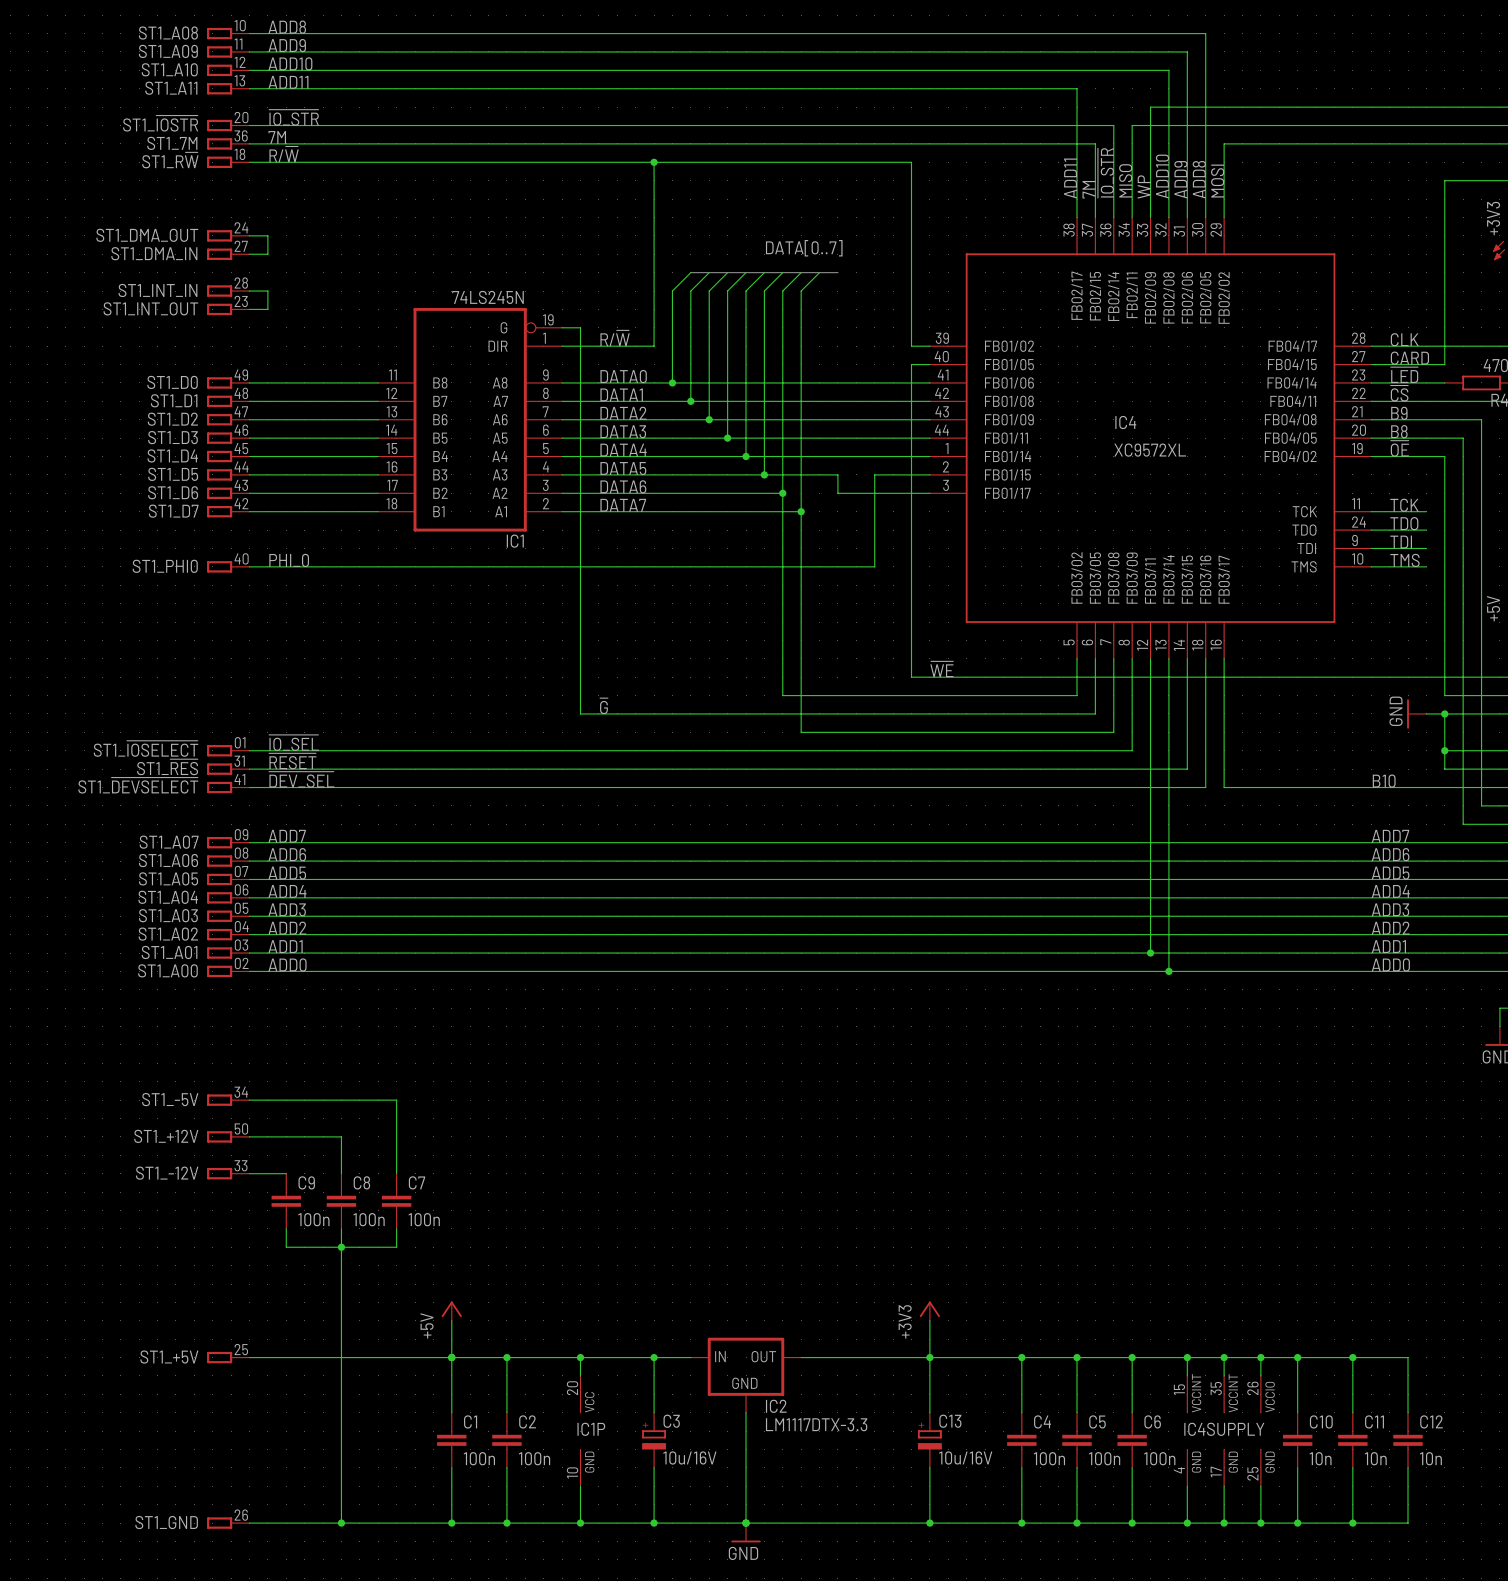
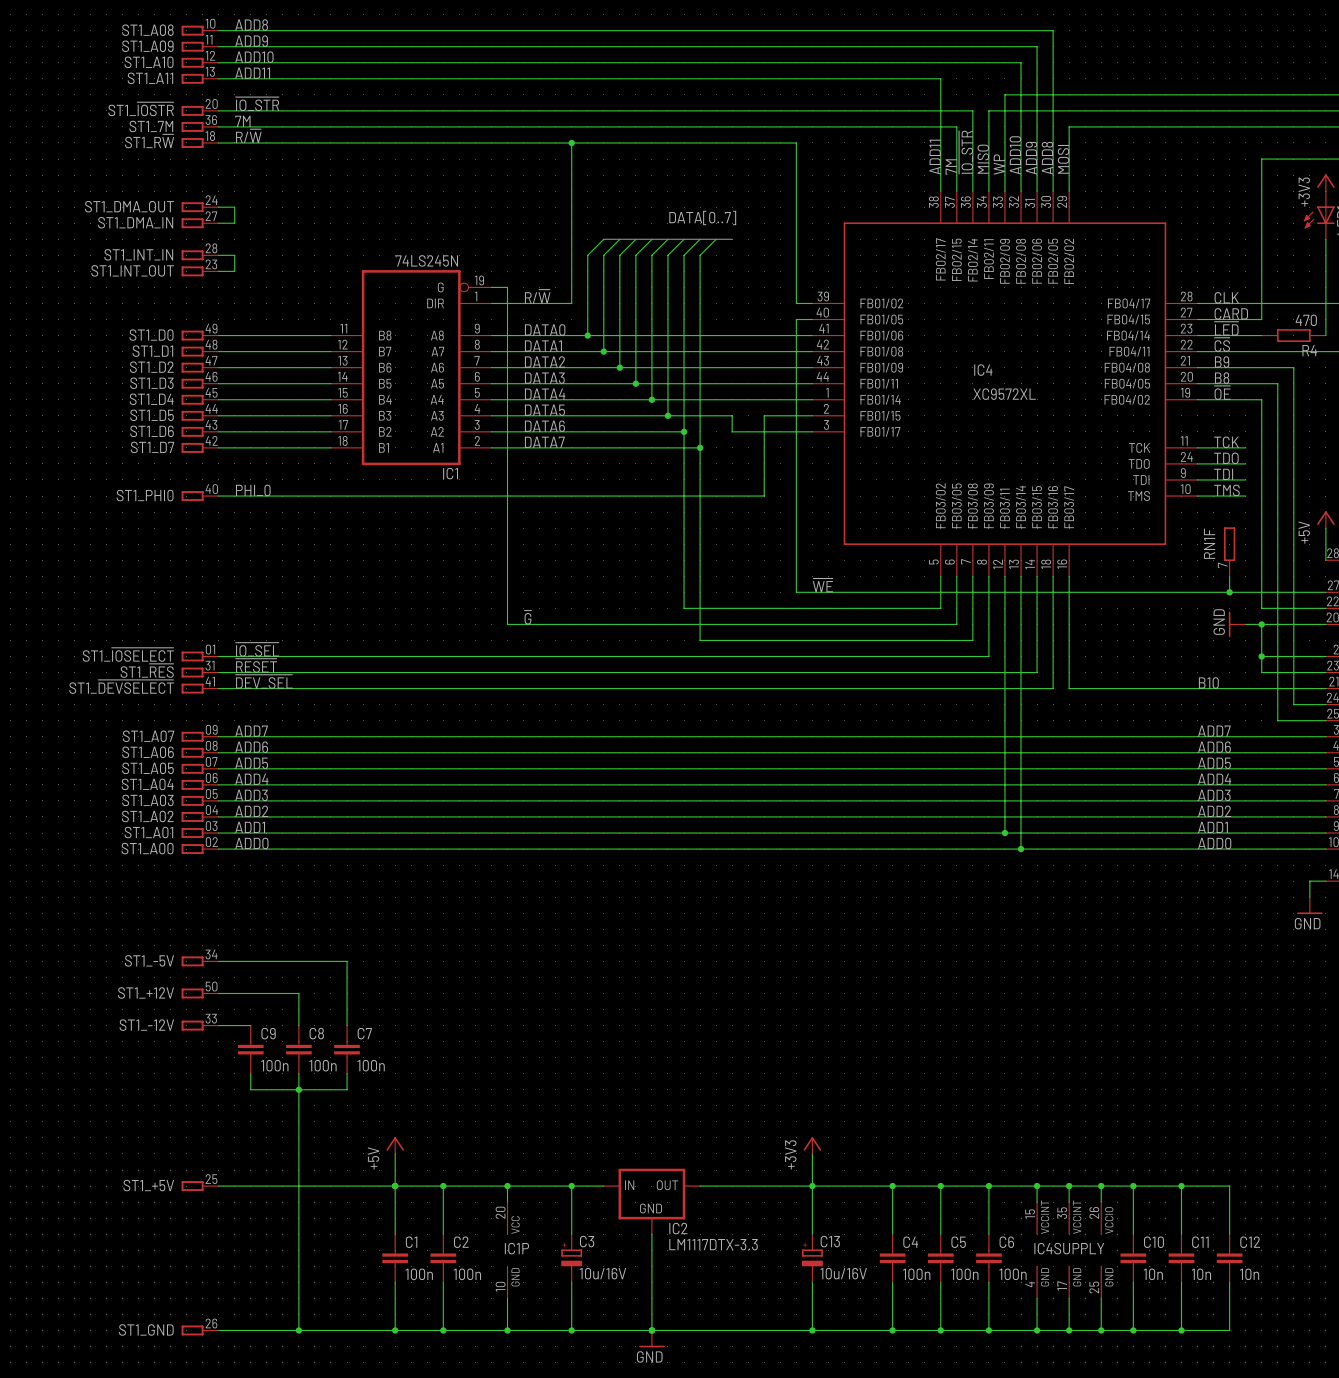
RN1F: none -> (1229, 551)
wire: none -> (1229, 576) (1229, 592)
junction: none -> (1229, 592)

